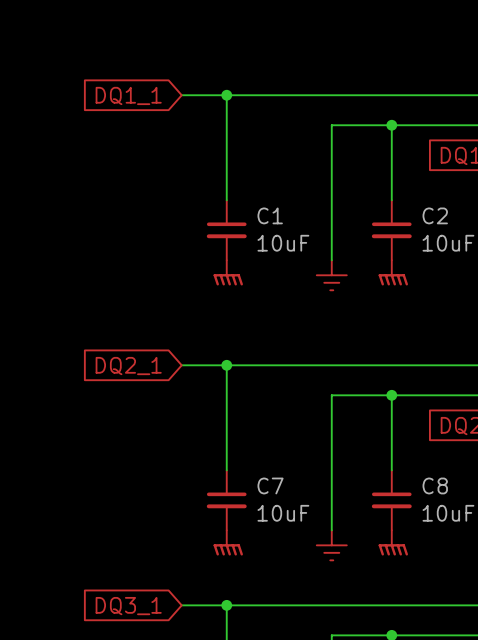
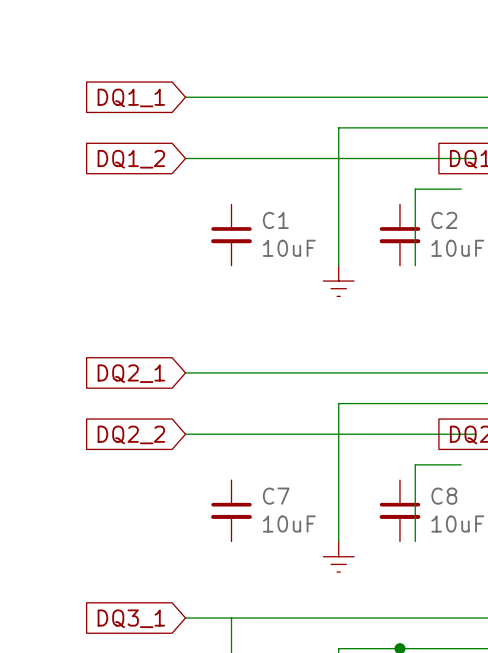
wire: (226, 95) (226, 200) -> none
junction: (226, 95) -> none
wire: (391, 125) (391, 200) -> none
junction: (391, 125) -> none
global label: none -> DQ1_2 (131, 159)
wire: none -> (185, 158) (476, 158)
wire: none -> (461, 189) (415, 189) (415, 265)
power symbol: (228, 272) -> none
power symbol: (393, 272) -> none
wire: (226, 365) (226, 470) -> none
junction: (226, 365) -> none
wire: (391, 395) (391, 470) -> none
junction: (391, 395) -> none
wire: none -> (185, 434) (476, 434)
global label: none -> DQ2_2 (131, 434)
wire: none -> (461, 464) (415, 464) (415, 541)
power symbol: (228, 542) -> none
power symbol: (393, 542) -> none
junction: (226, 605) -> none

